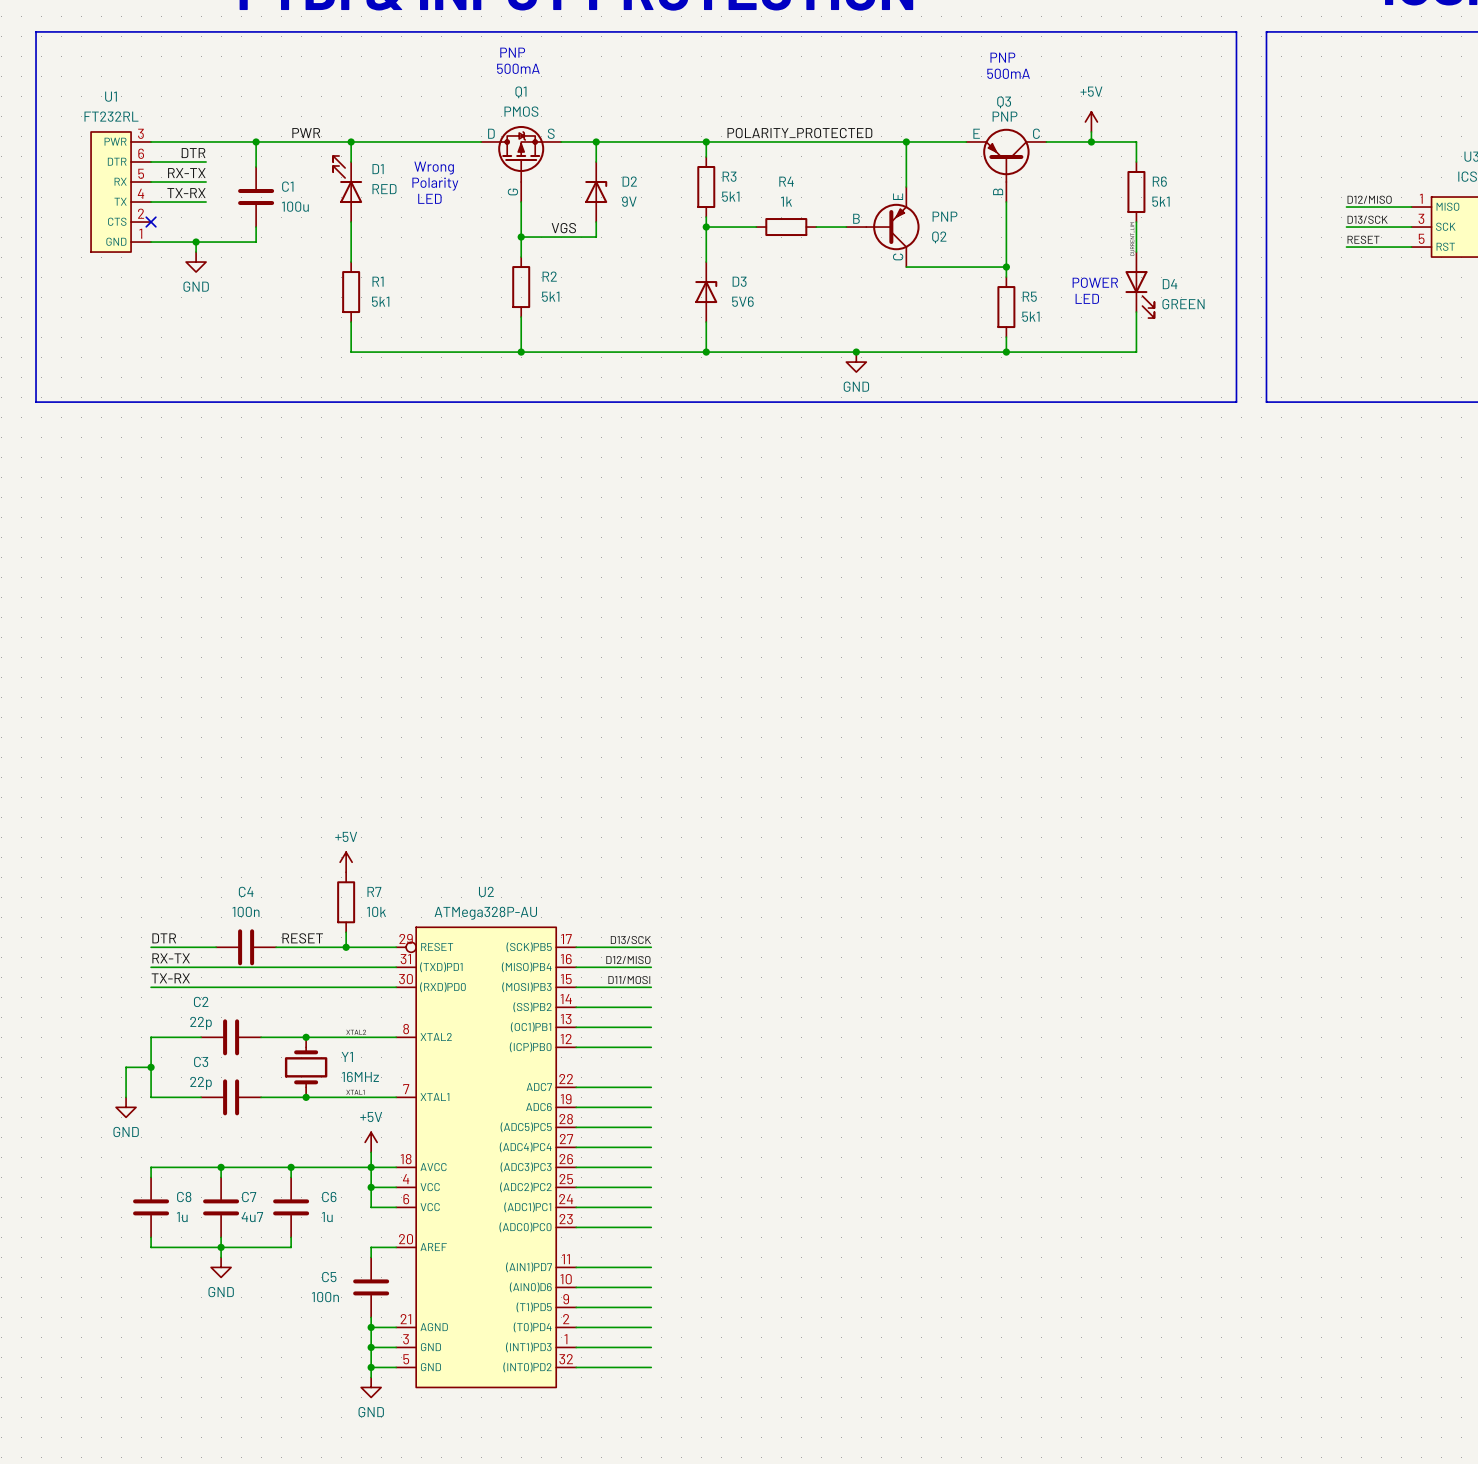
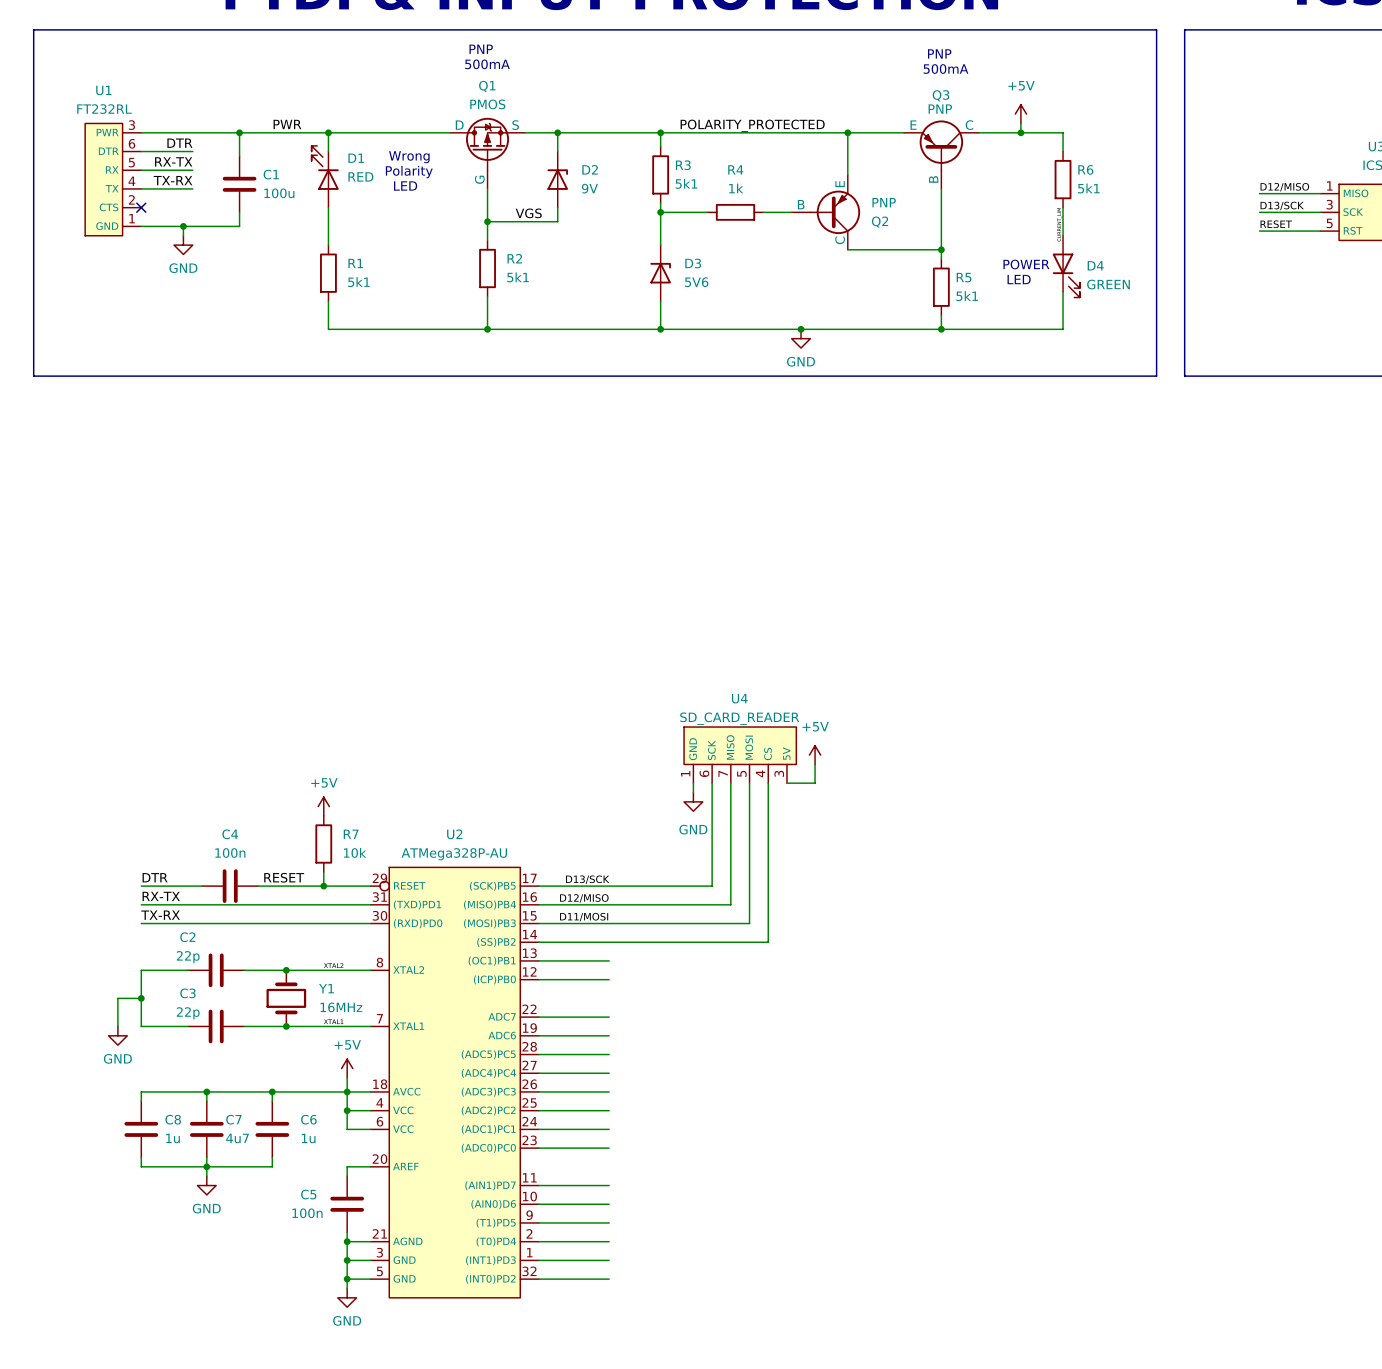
U4: none -> SD_CARD_READER (740, 755)
power symbol: none -> +5V (815, 755)
wire: none -> (815, 764) (815, 783) (786, 783)
wire: none -> (693, 783) (693, 792)
wire: none -> (712, 783) (712, 886) (609, 886)
wire: none -> (730, 783) (730, 904) (609, 904)
wire: none -> (749, 783) (749, 923) (609, 923)
wire: none -> (768, 783) (768, 942) (609, 942)
power symbol: none -> GND (693, 801)

